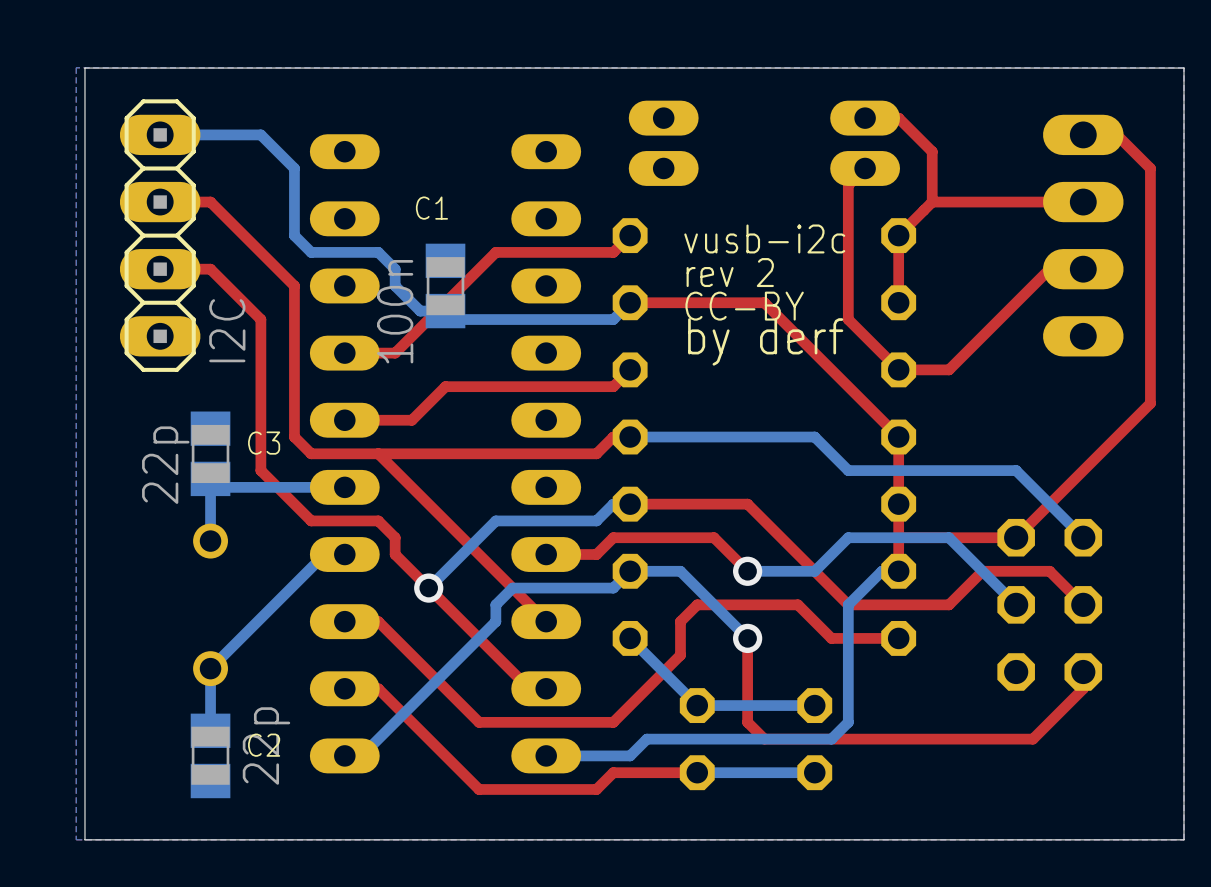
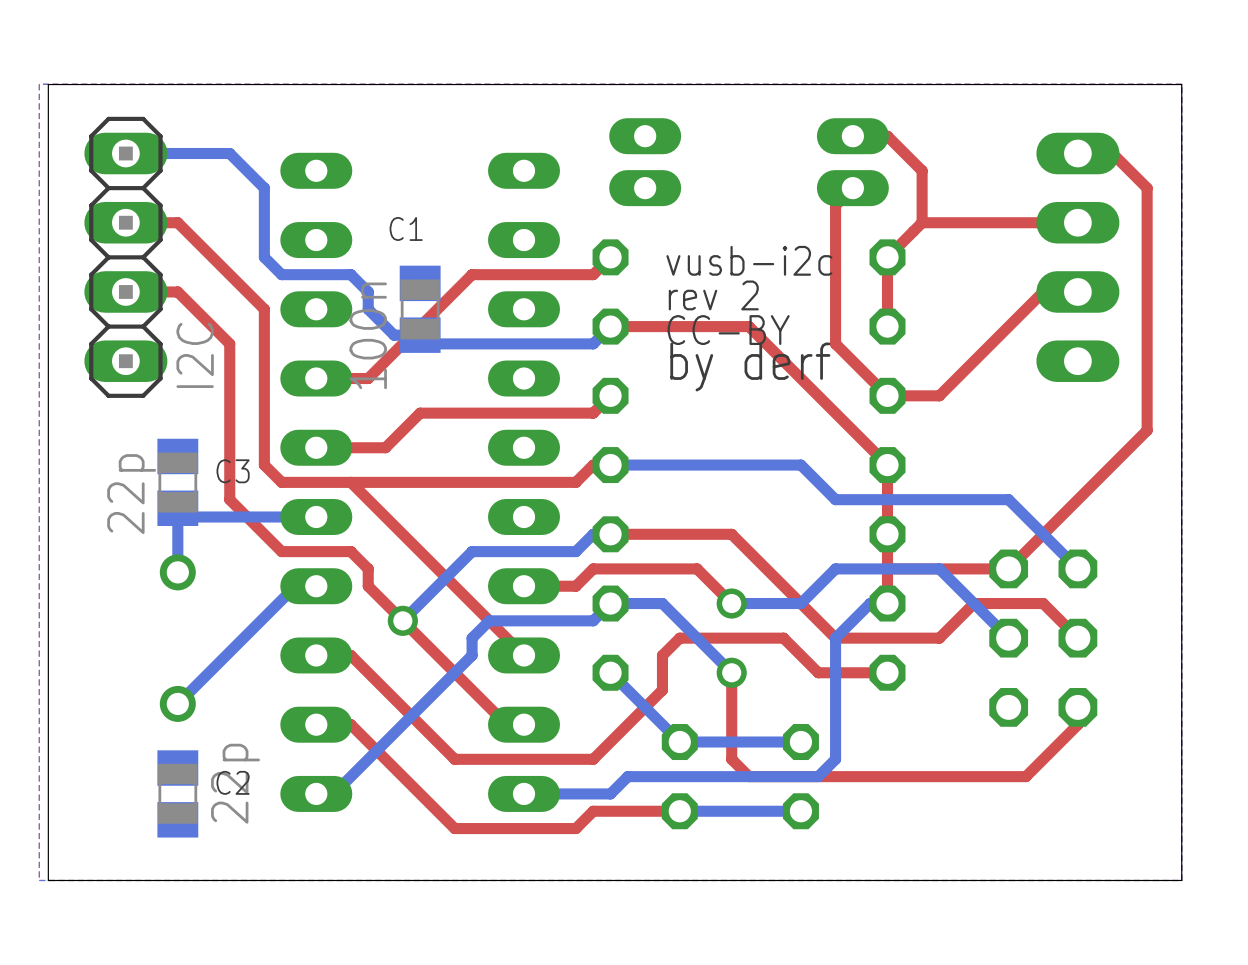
bottom track: (210, 668) (210, 730) -> none

